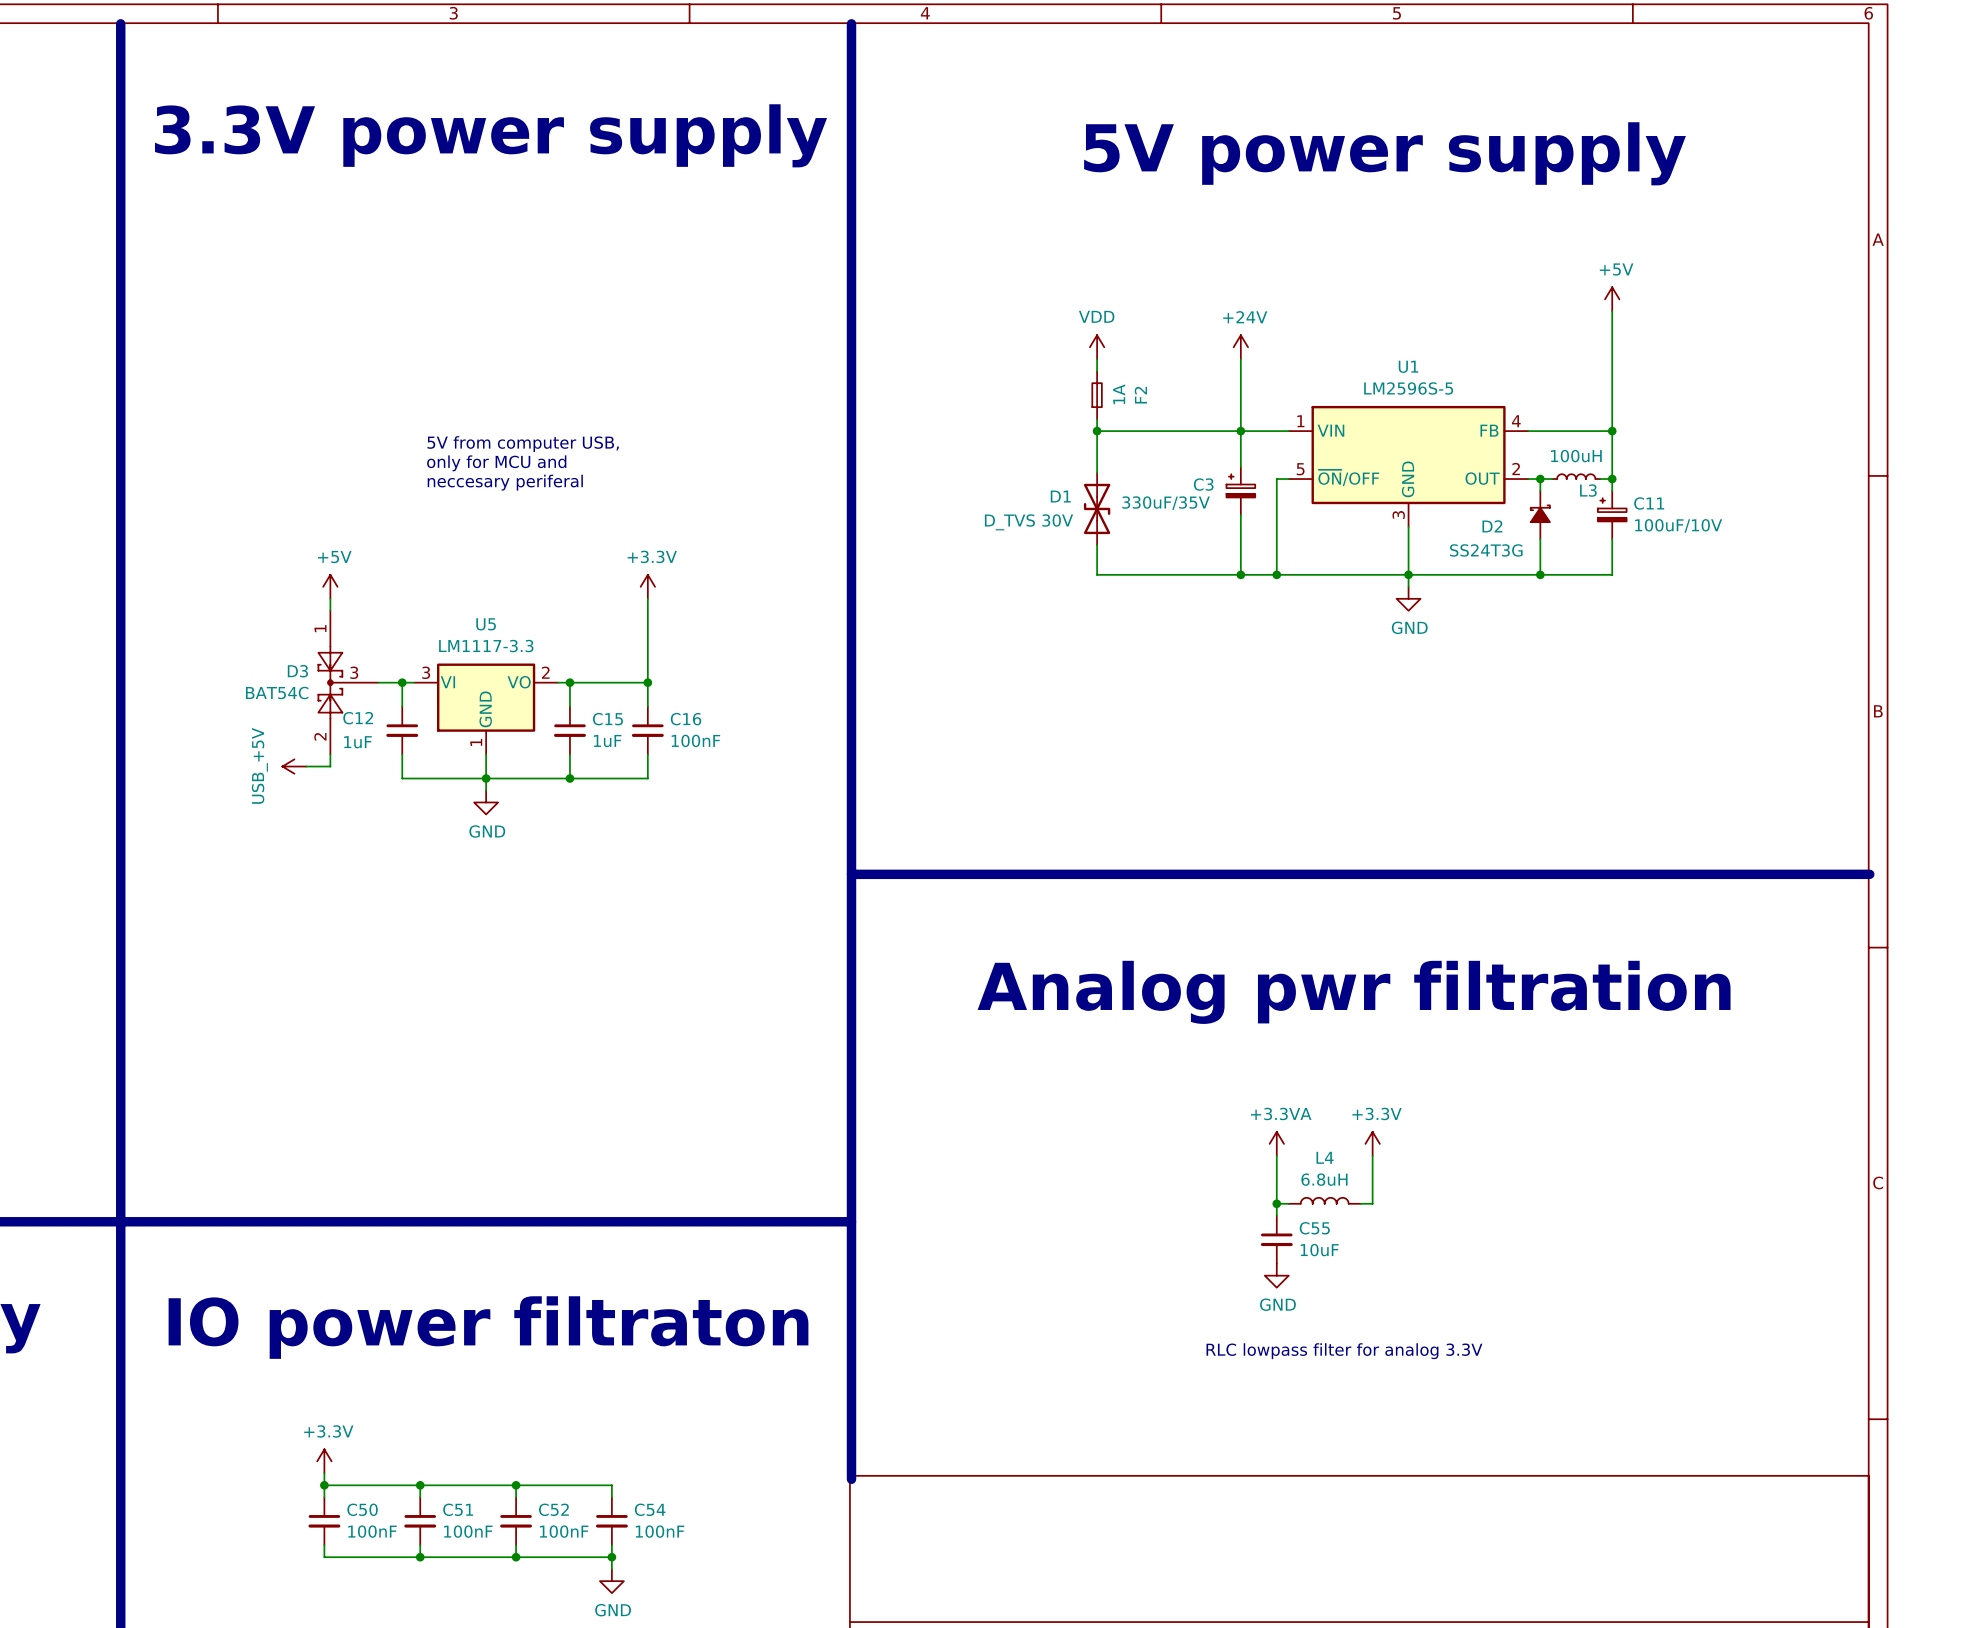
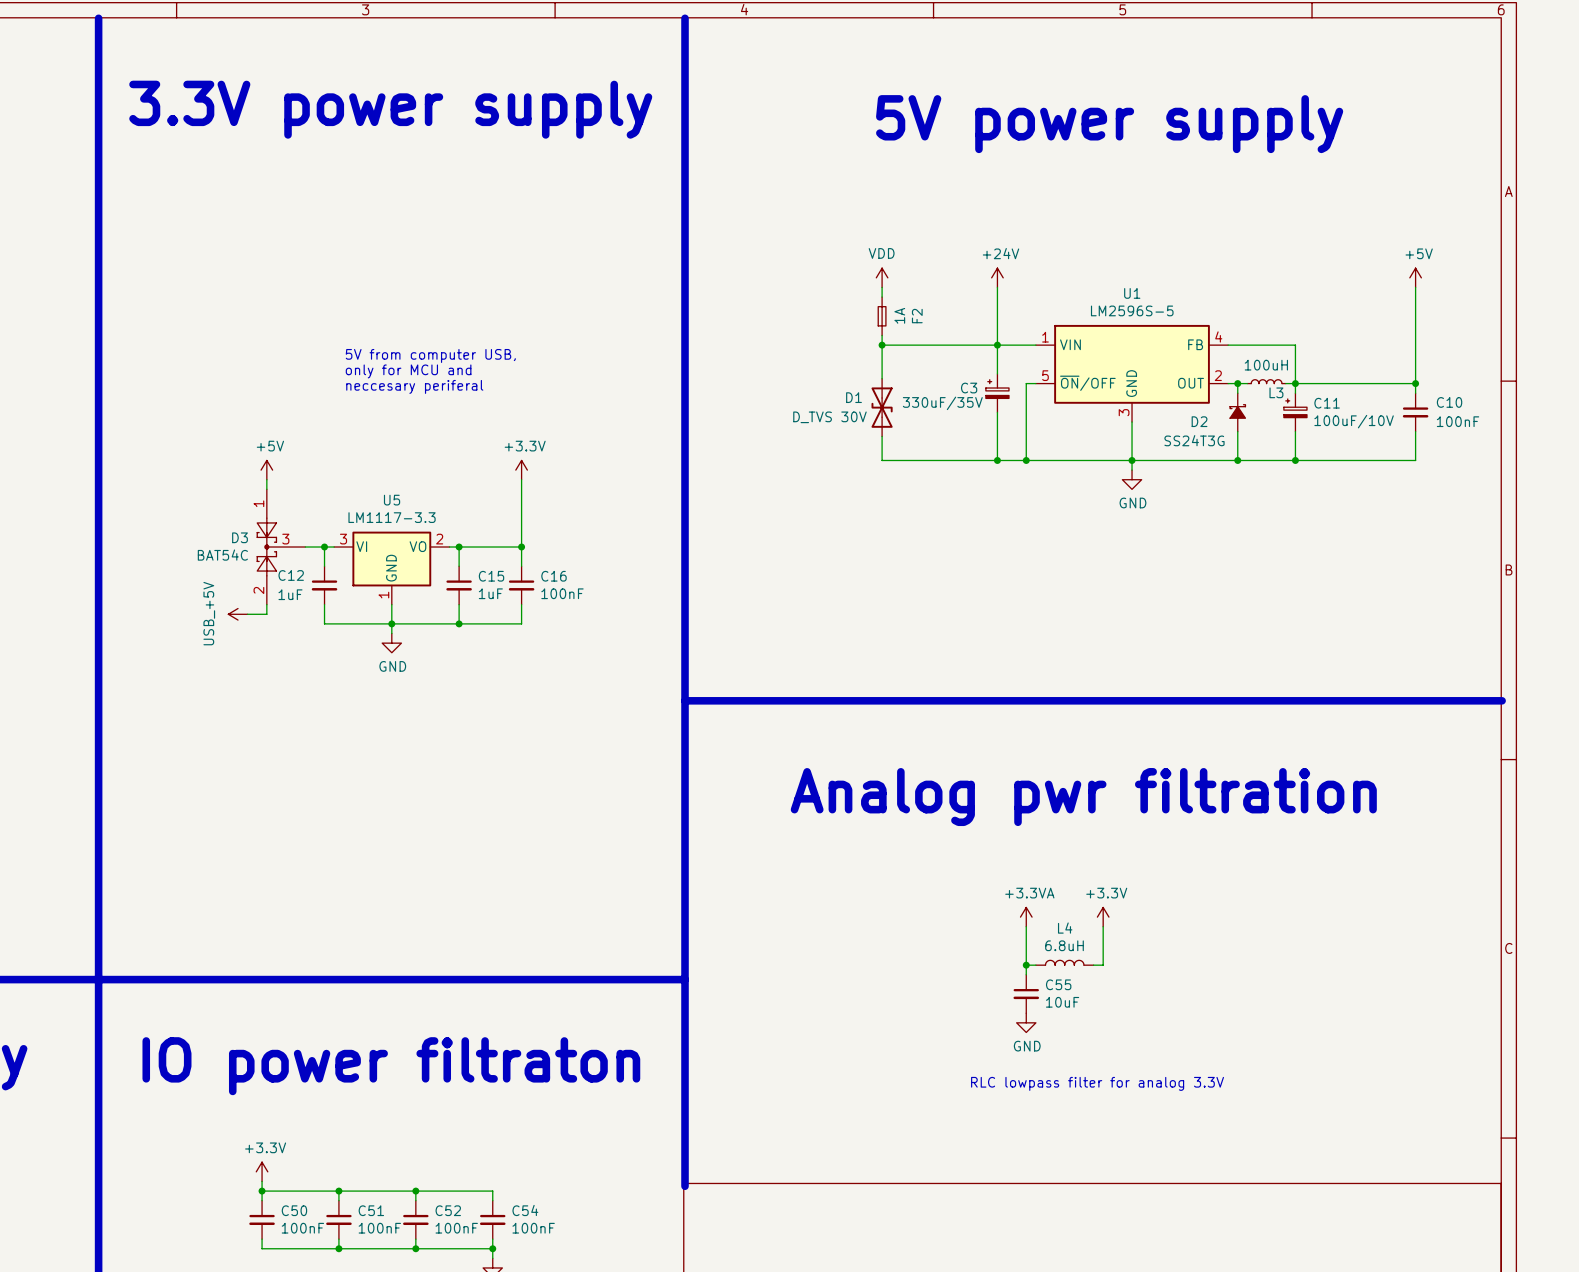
power symbol position: +5V (1612, 299) -> +5V (1415, 277)
wire: (1612, 311) (1612, 431) -> none
wire: none -> (1415, 287) (1415, 393)
junction: (1612, 431) -> none
wire: none -> (1295, 383) (1415, 383)
junction: none -> (1415, 383)
C10: none -> 100nF (1415, 412)
wire: none -> (1415, 431) (1415, 460) (1295, 460)
junction: none -> (1295, 460)

